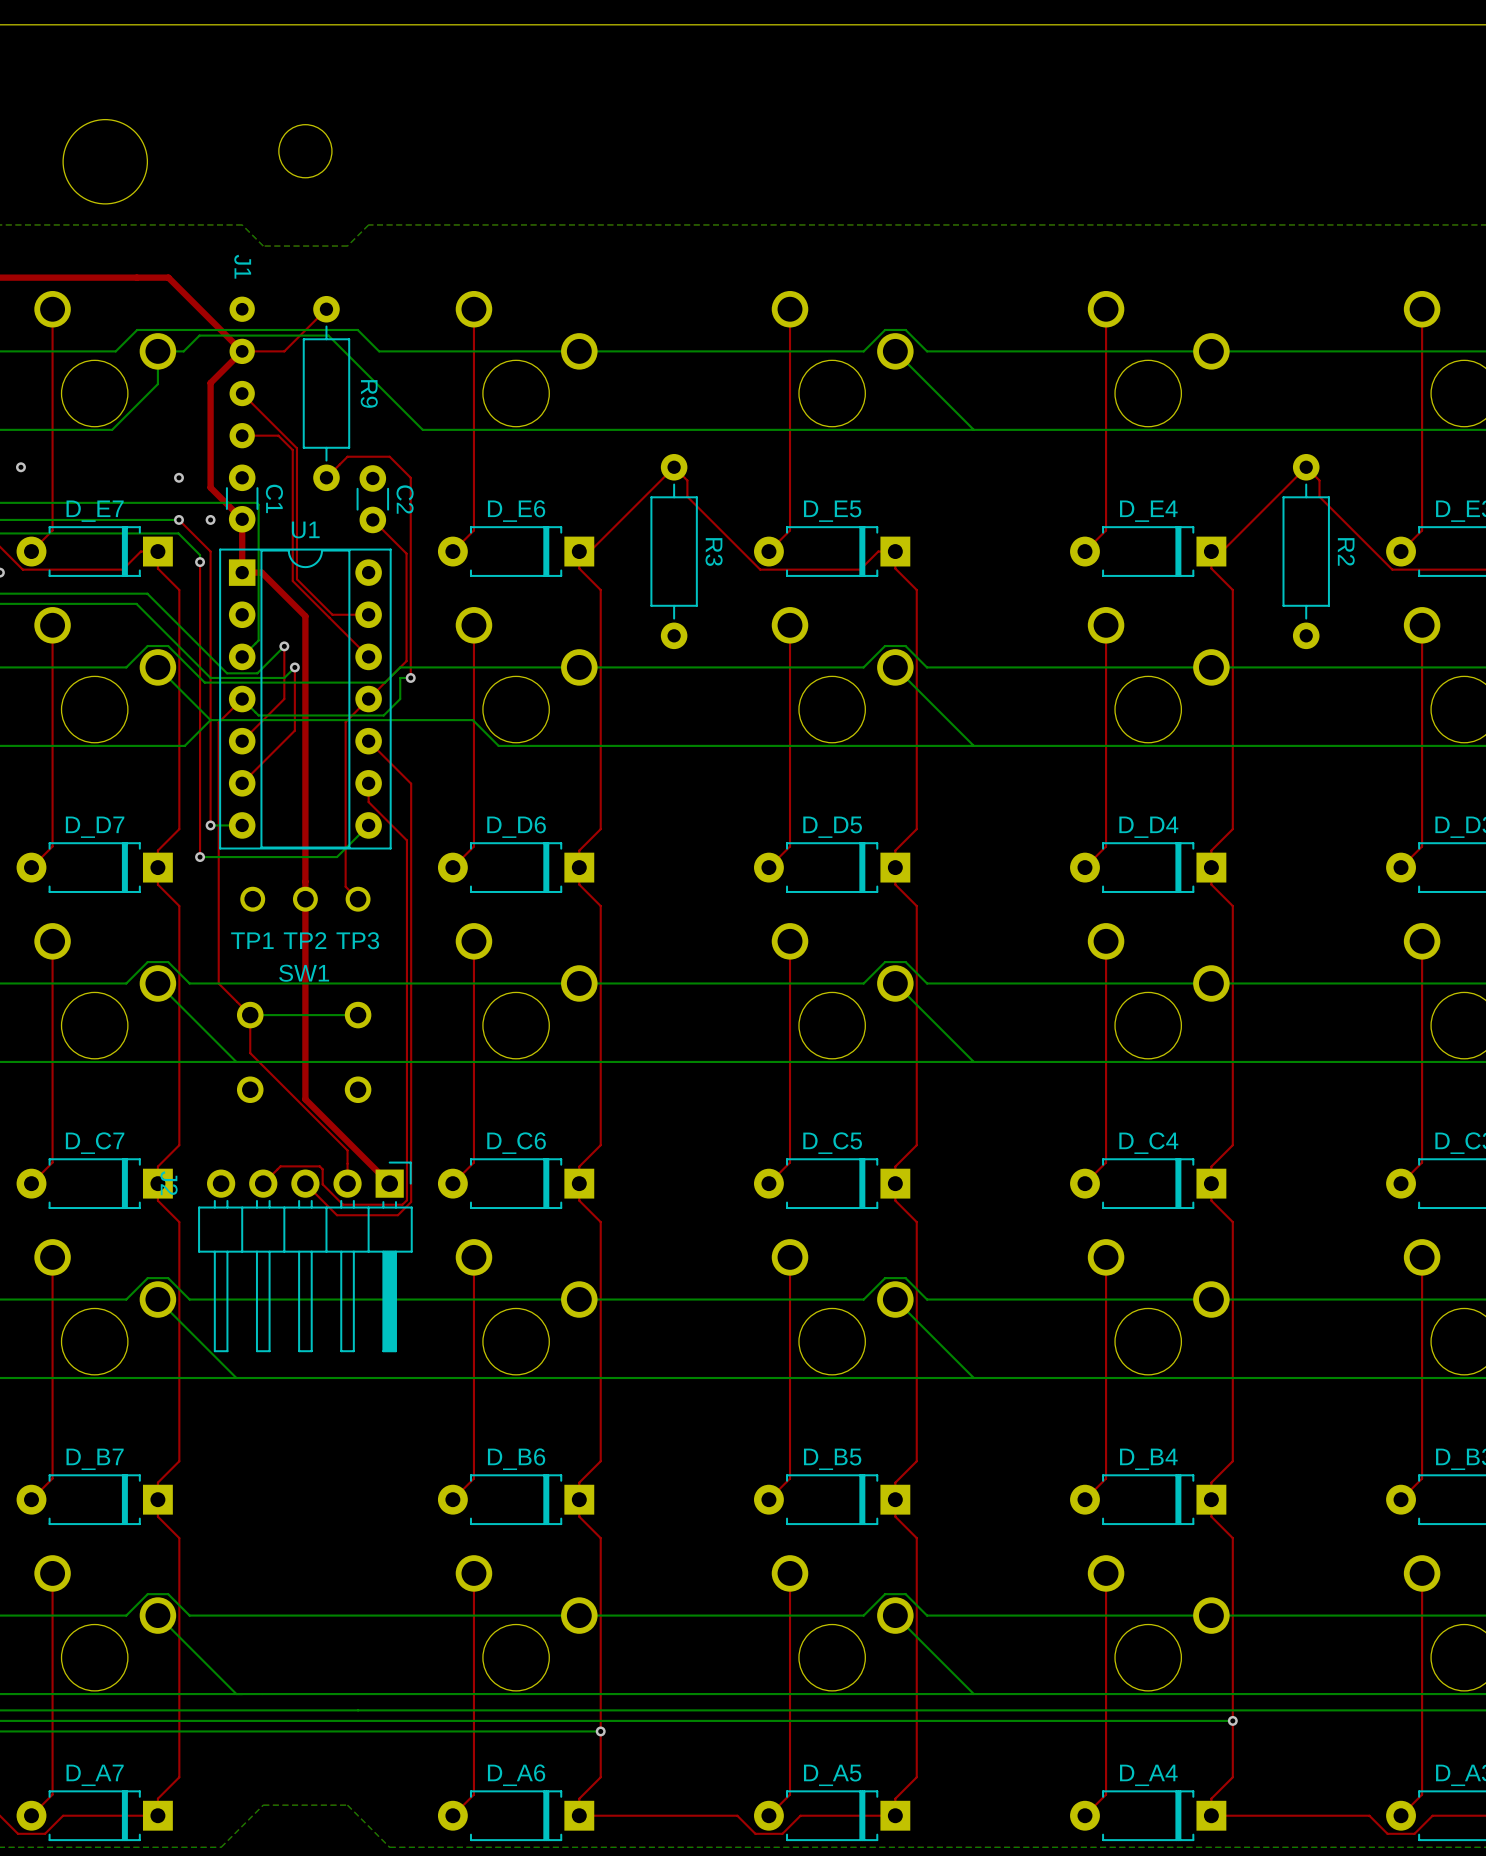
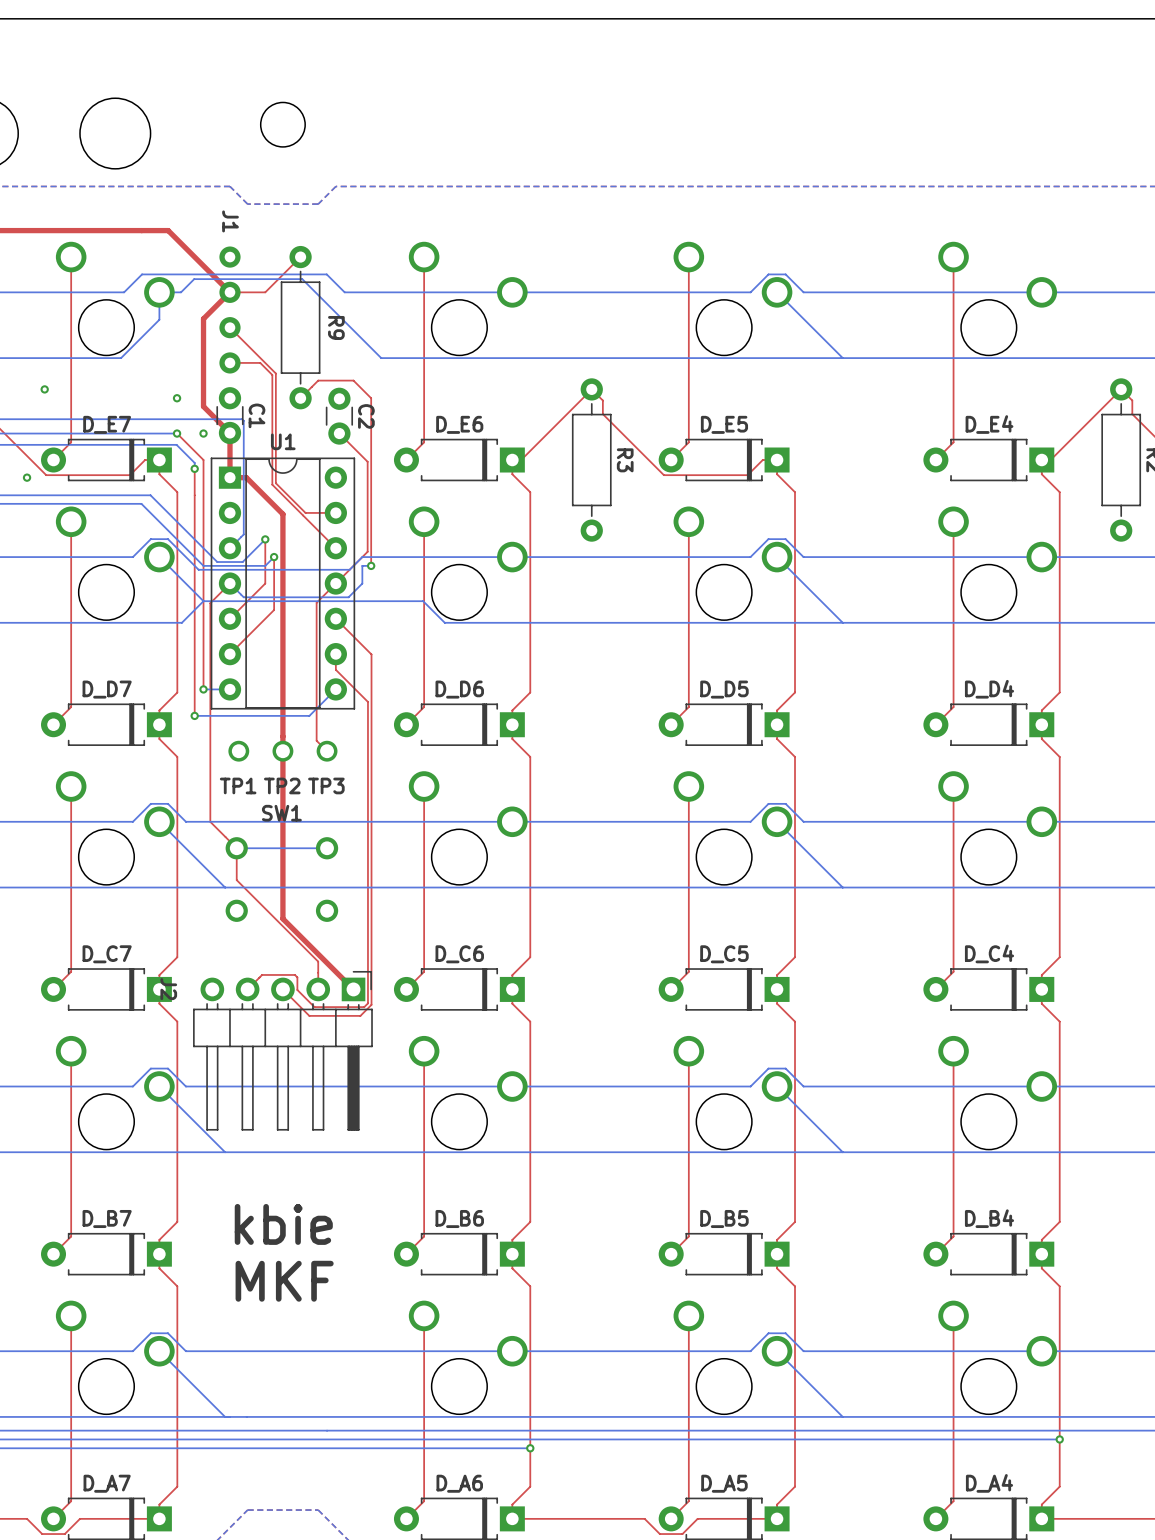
text: none -> kbie (283, 1224)
text: none -> MKF (284, 1281)

